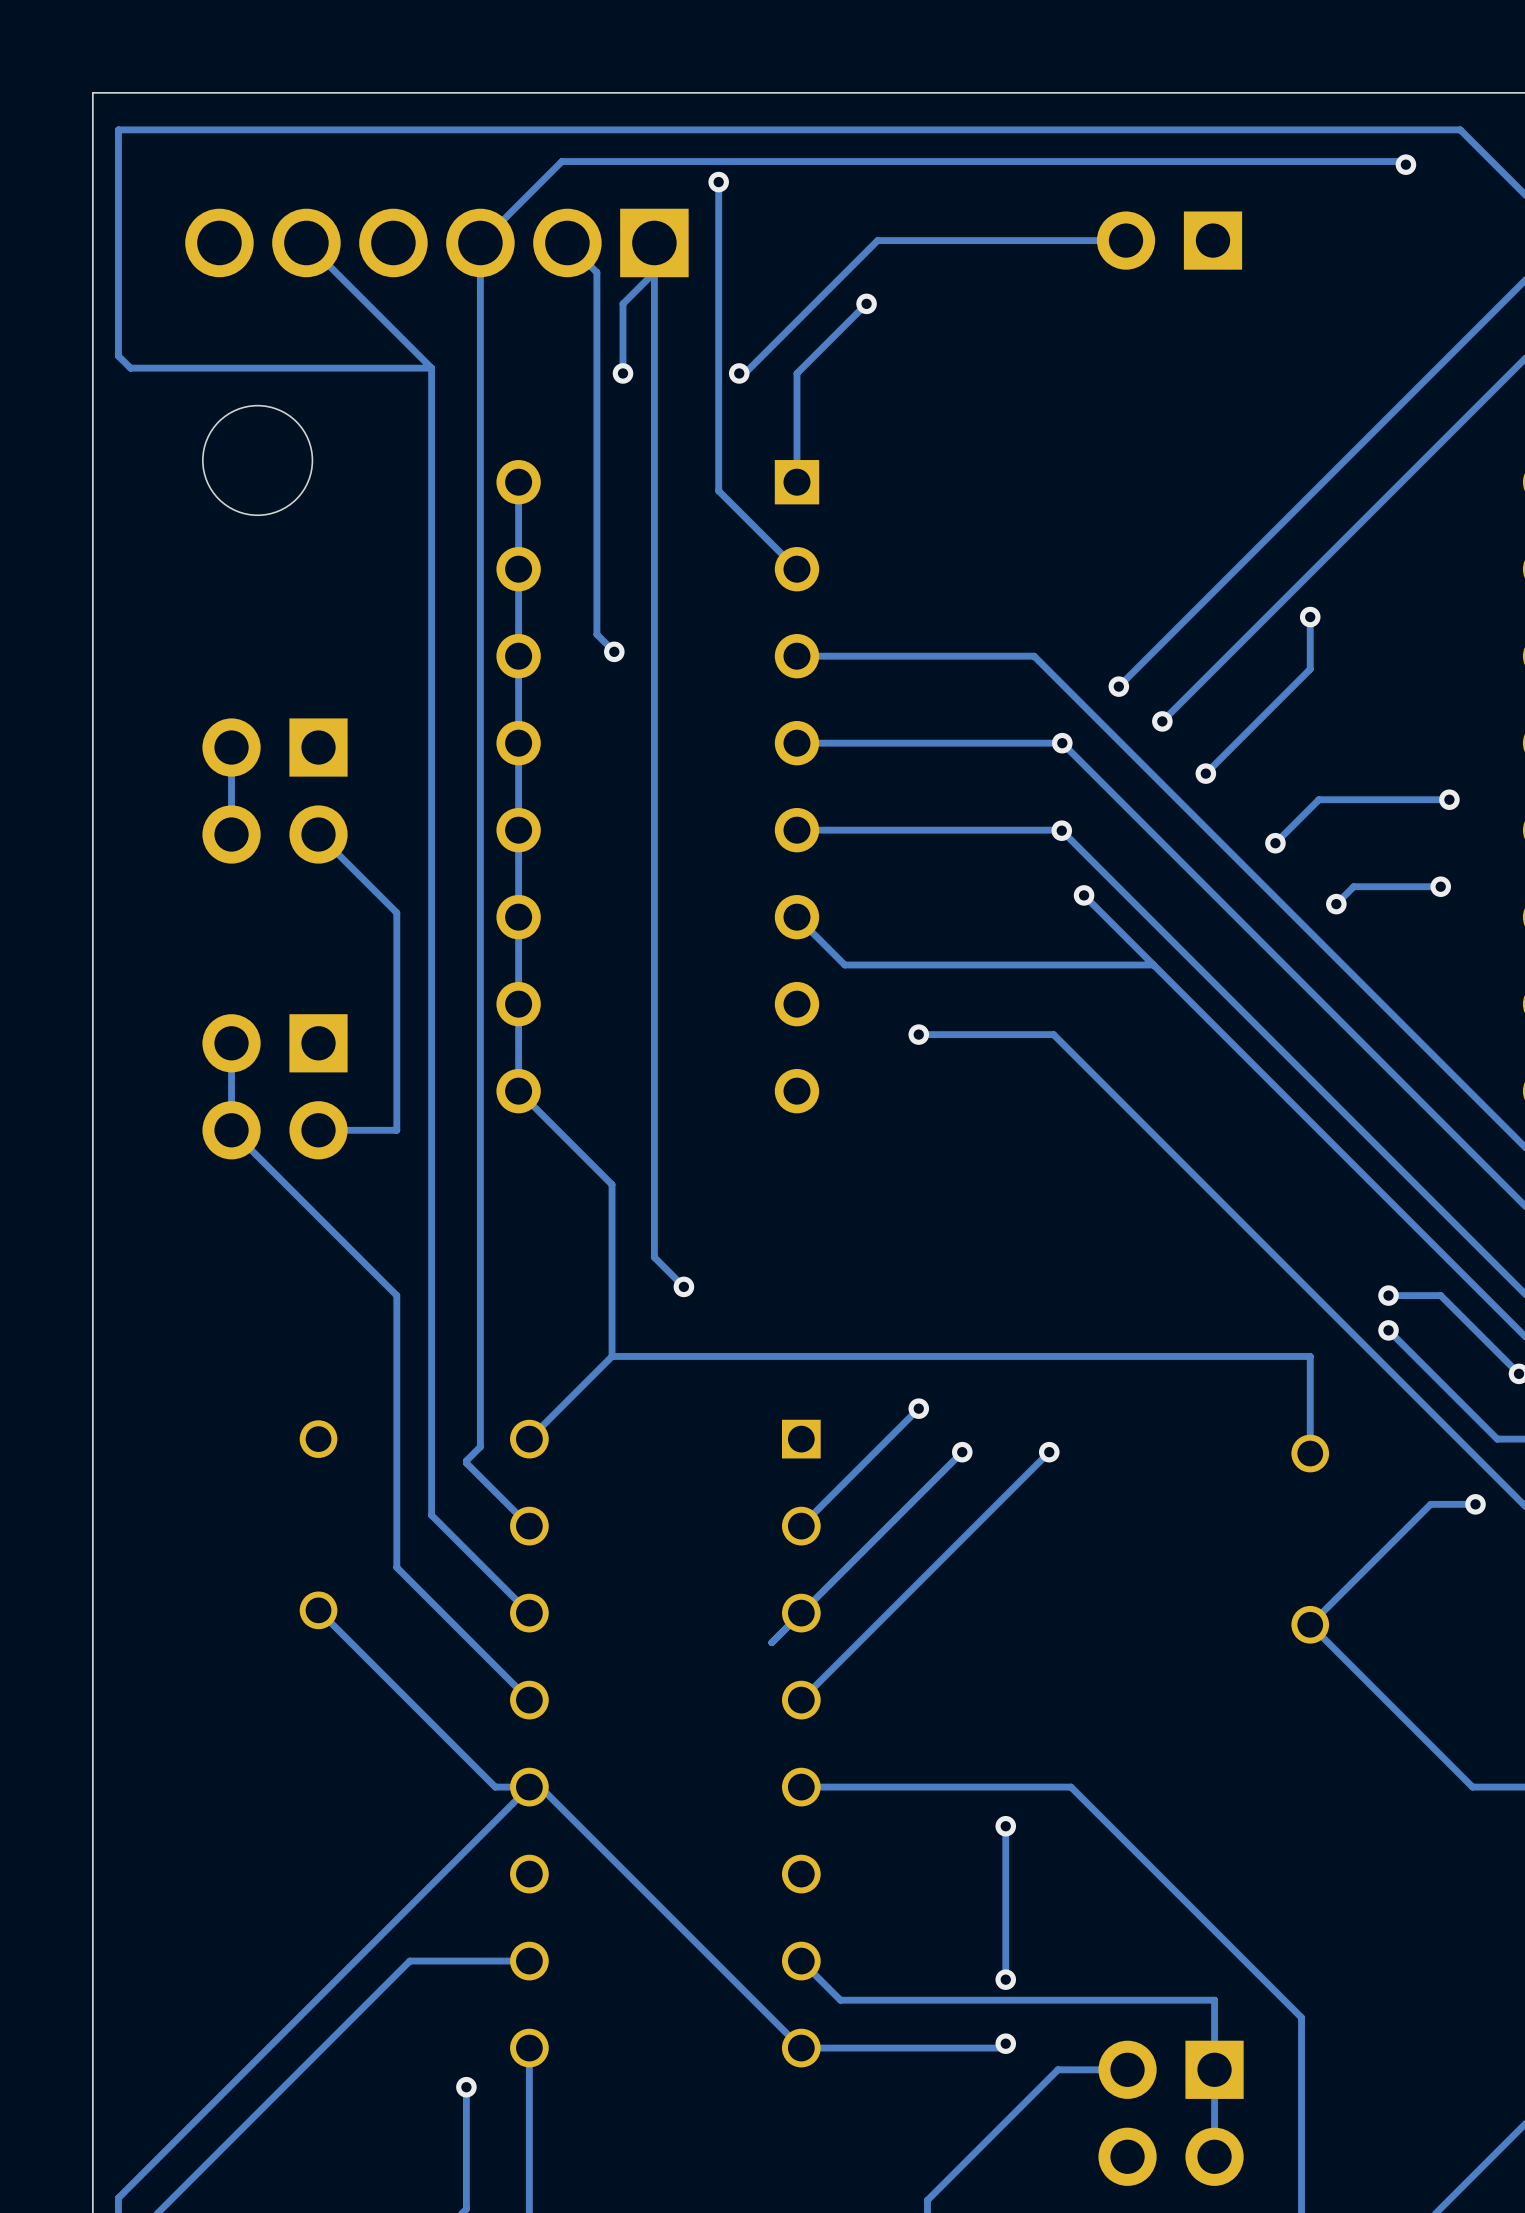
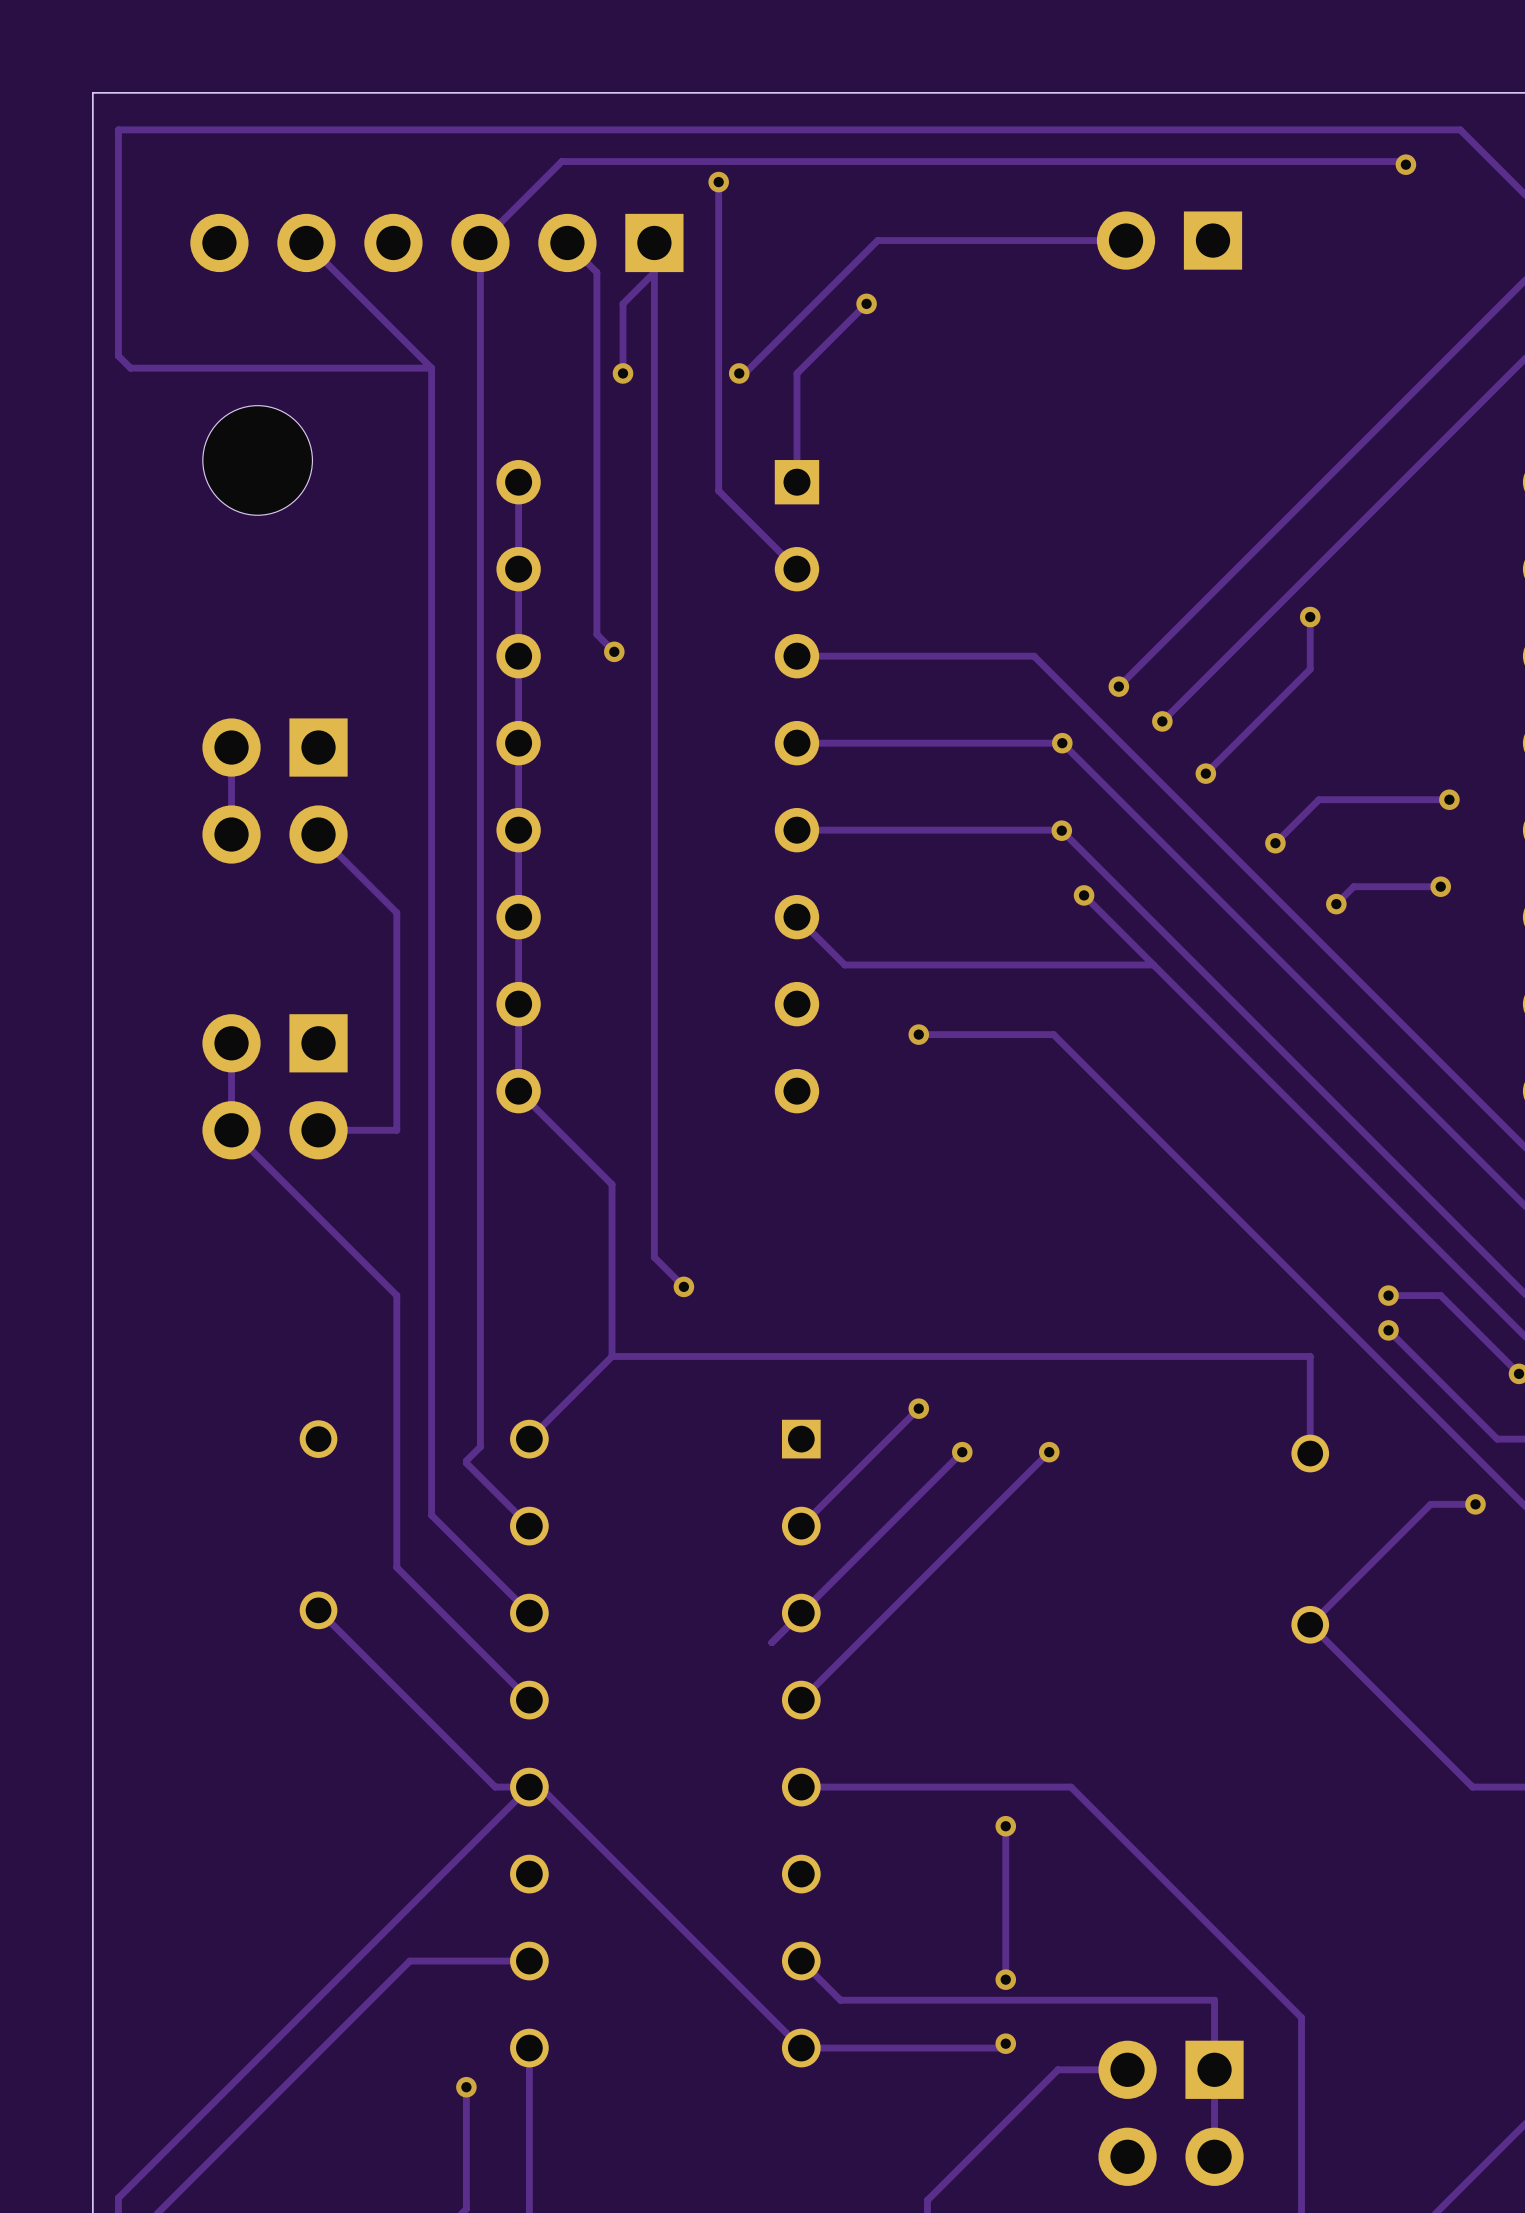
part footprint: [185, 208, 689, 278] -> [190, 213, 684, 273]

